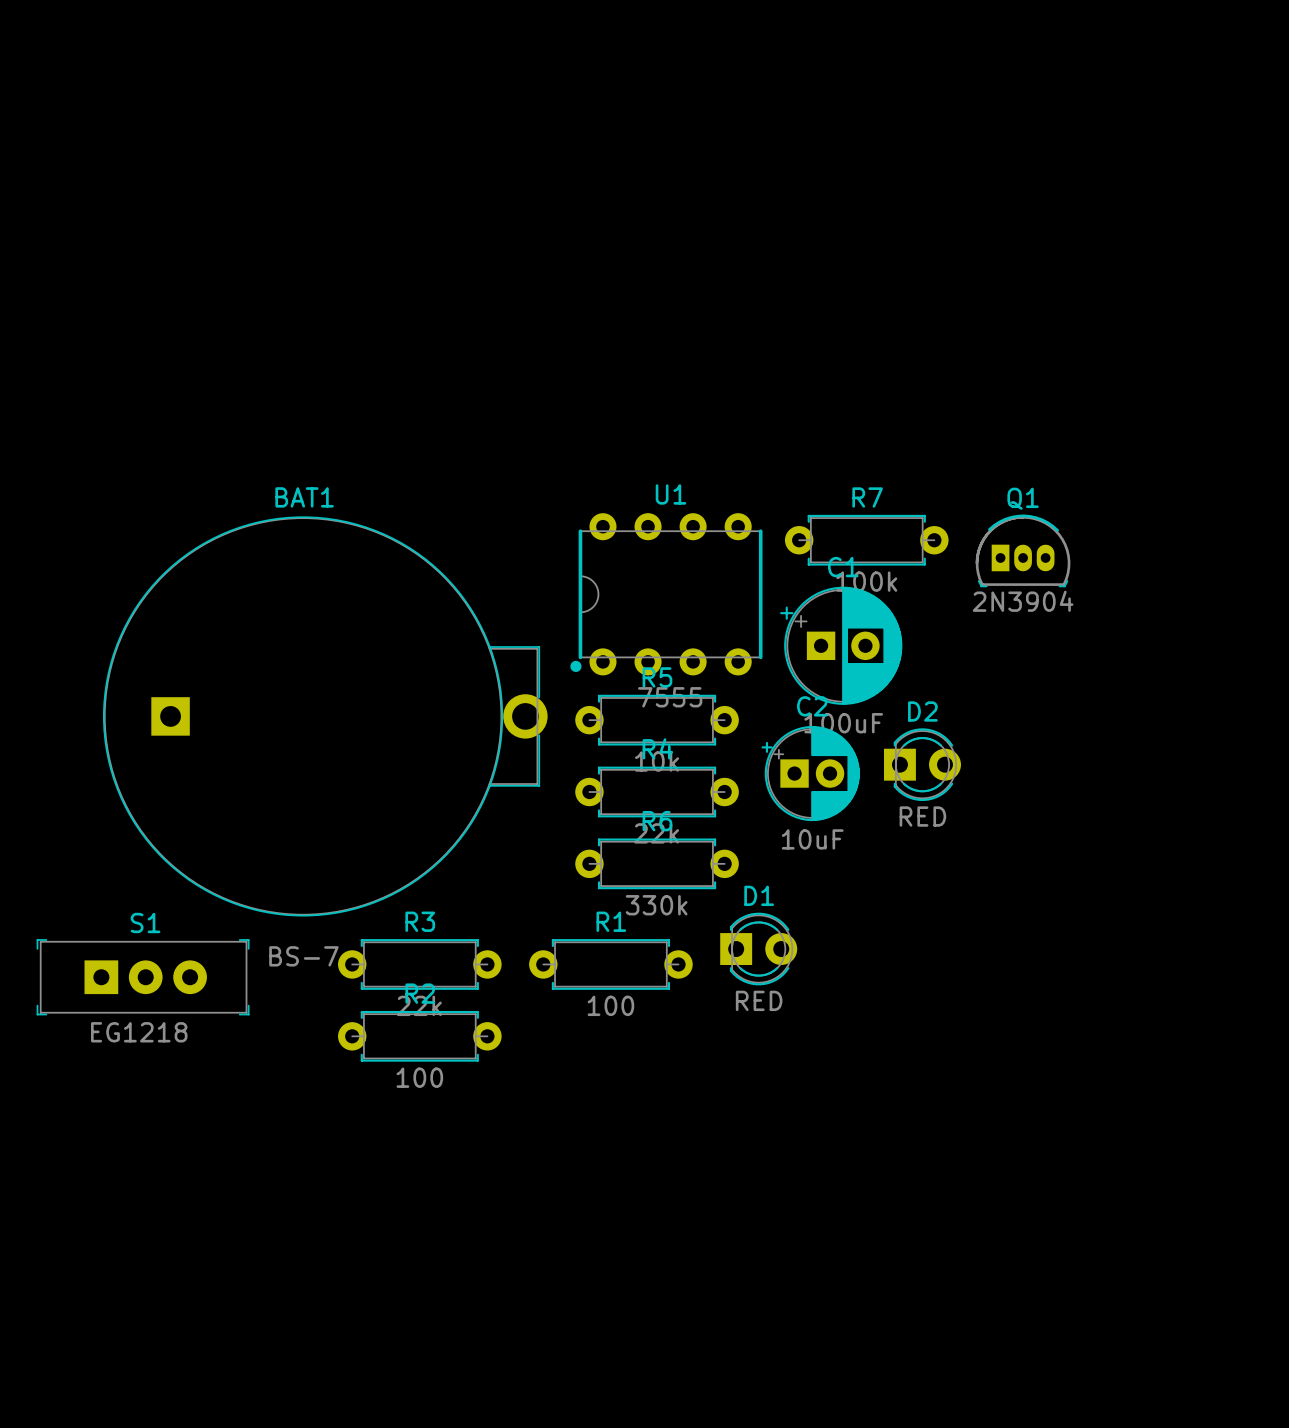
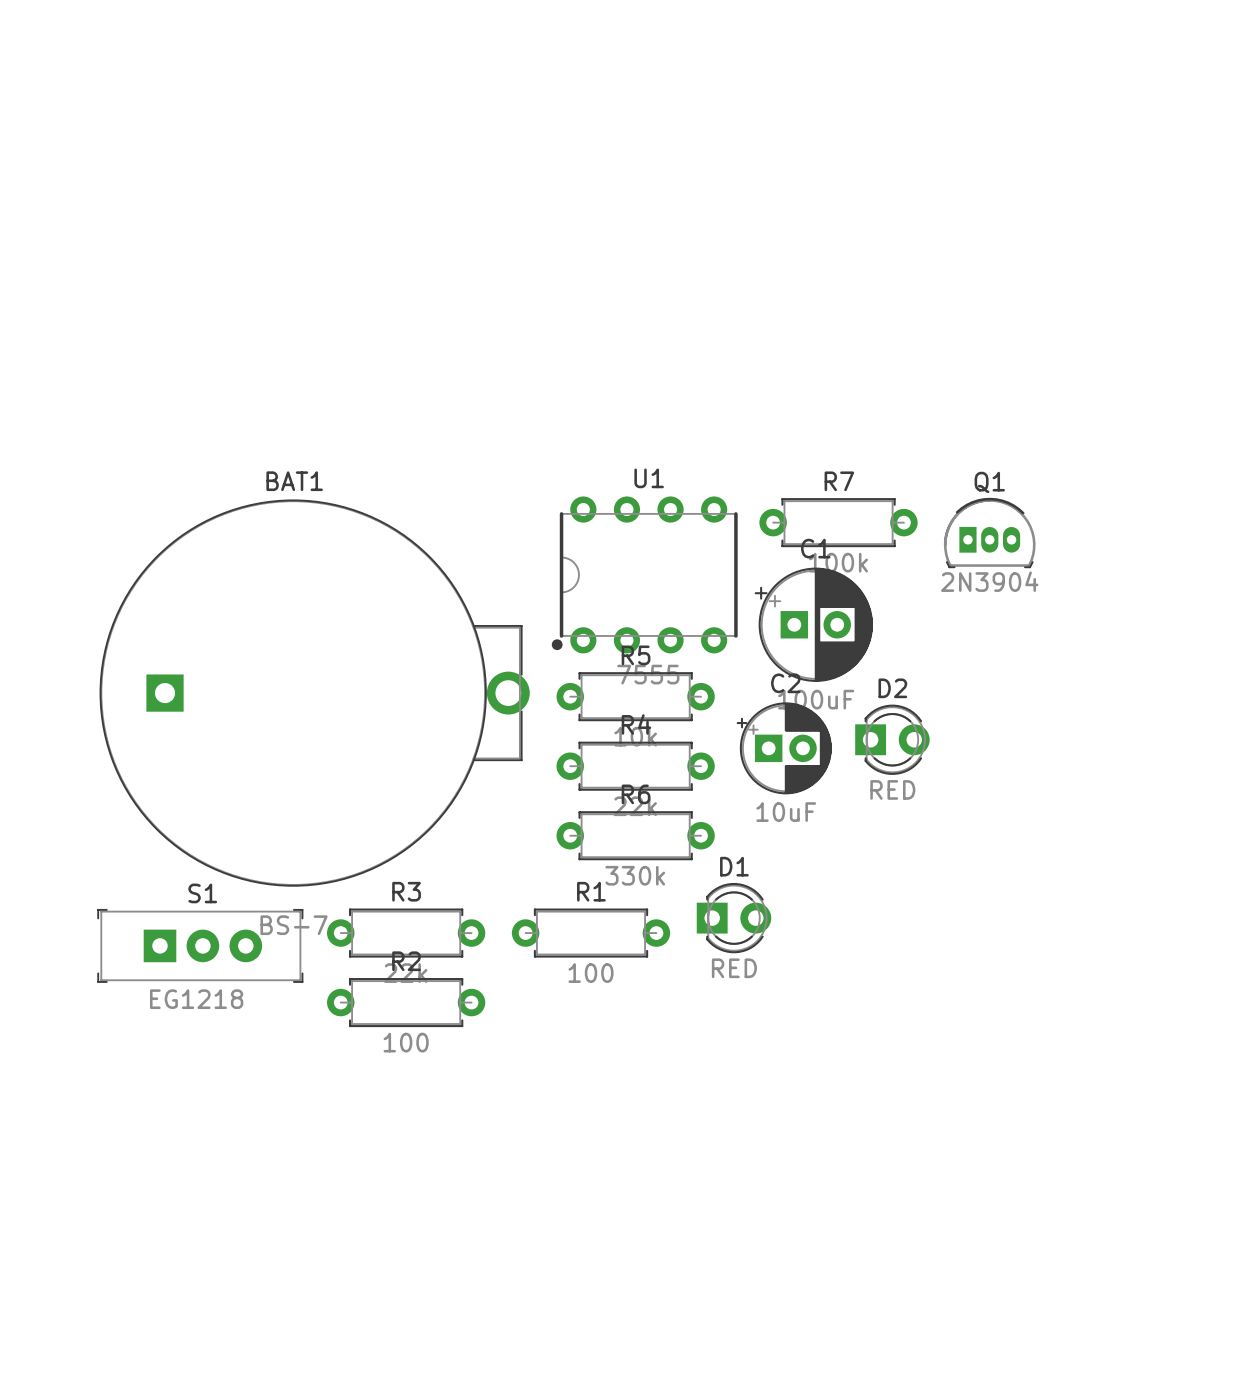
S1 position: (143, 977) -> (200, 945)

